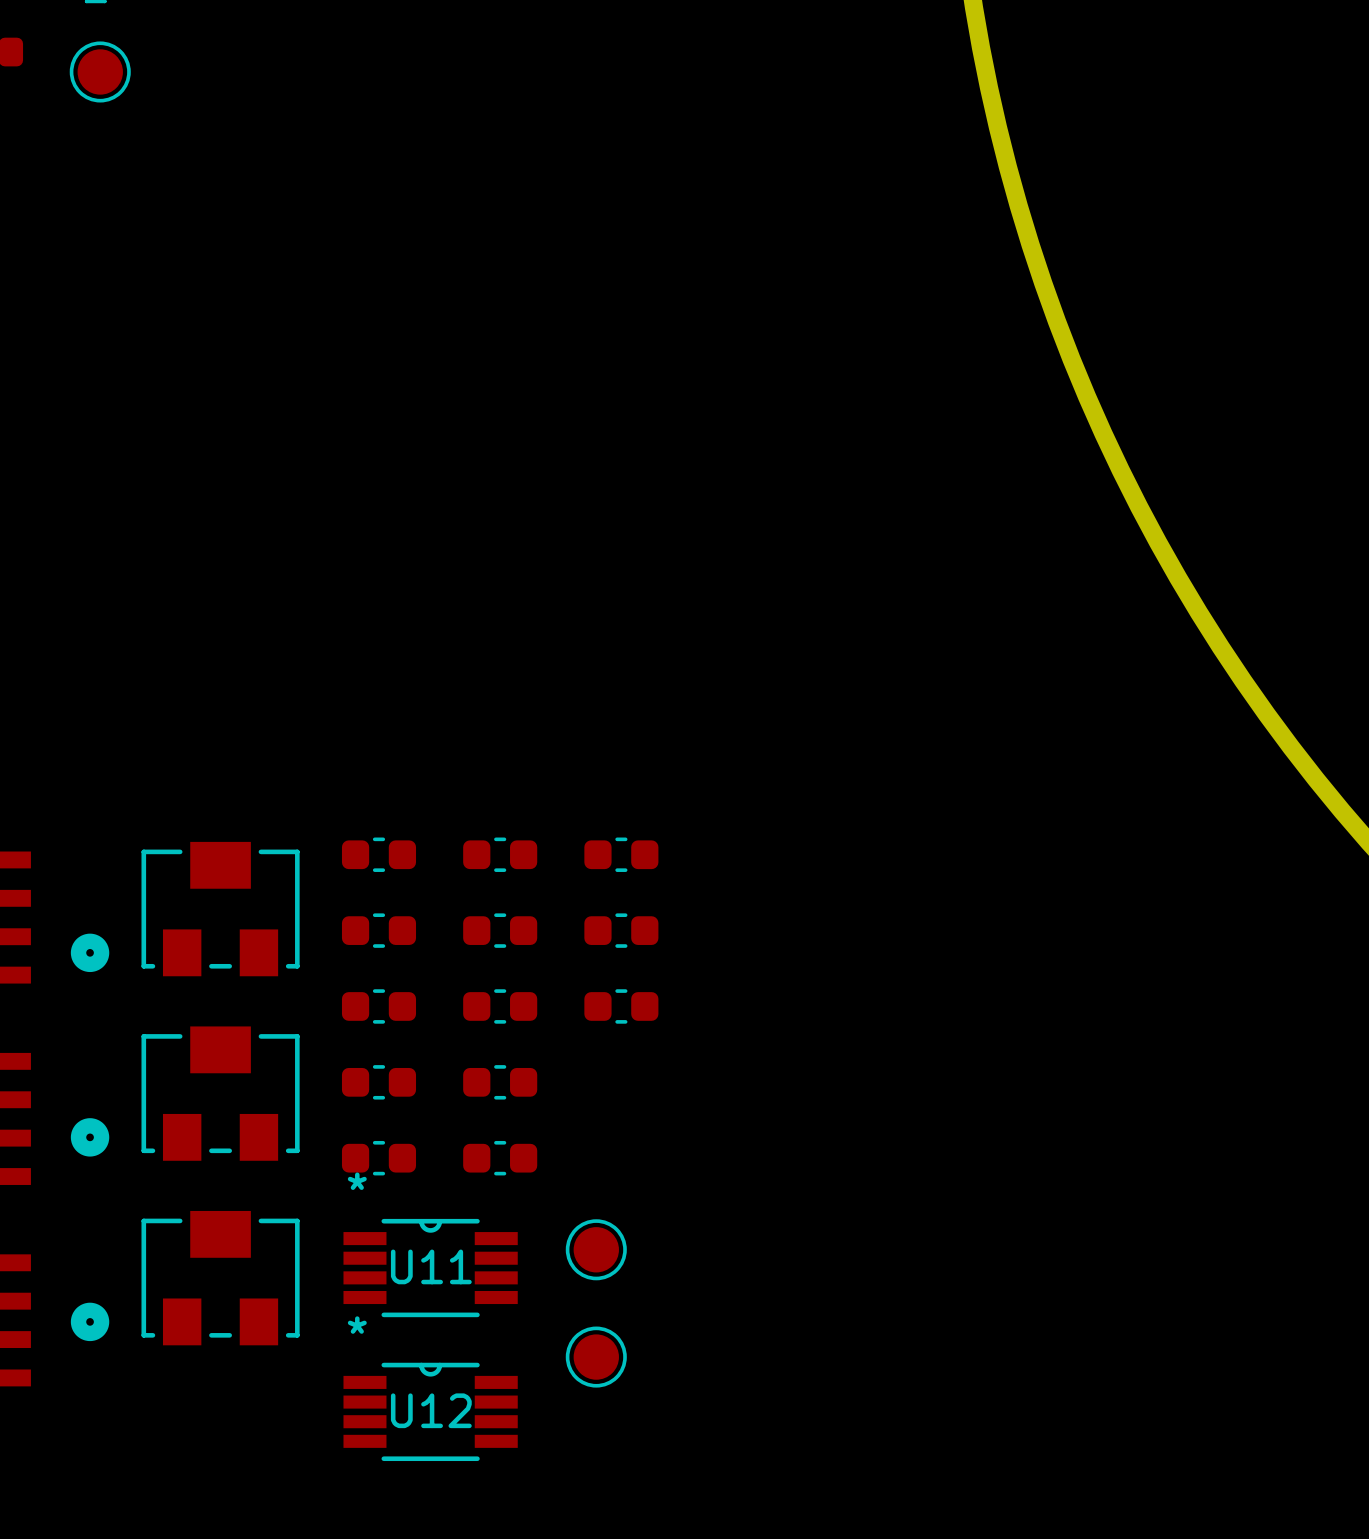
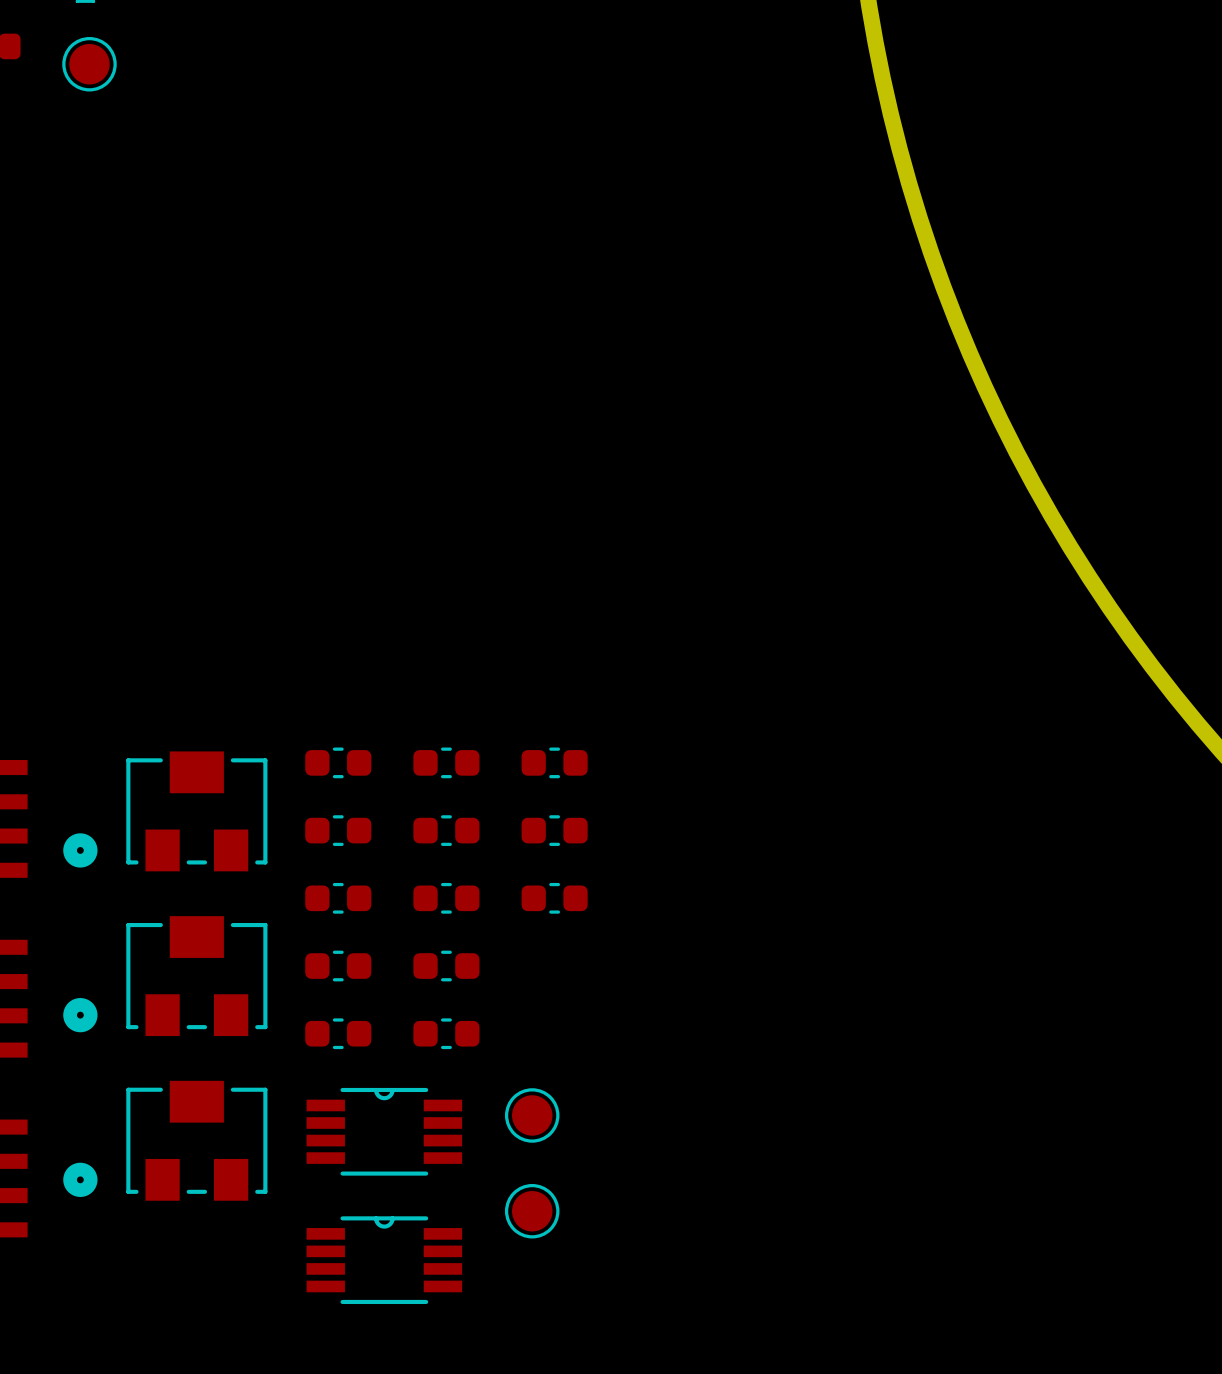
U11 text: * (357, 1181) -> none
U11 name: U11 (431, 1266) -> none
U12 text: * (357, 1325) -> none
U12 name: U12 (431, 1410) -> none

